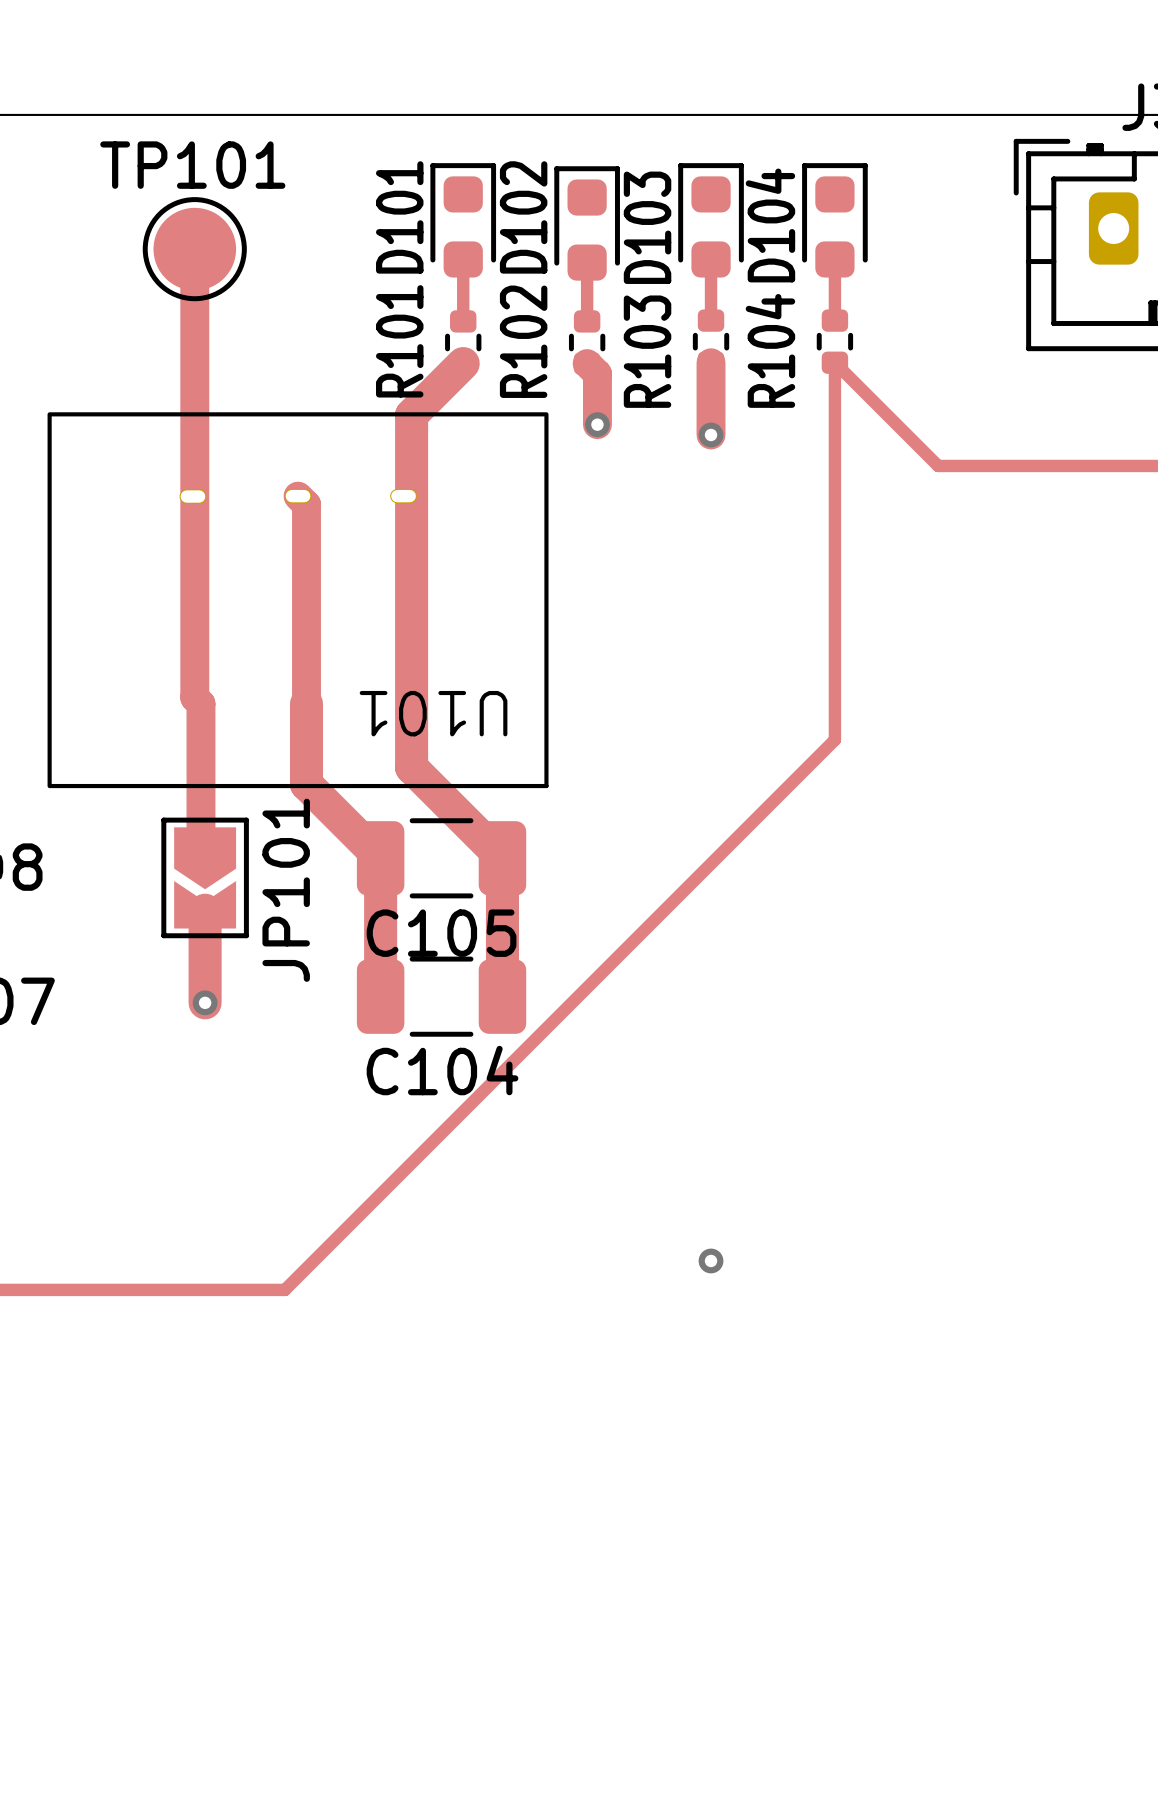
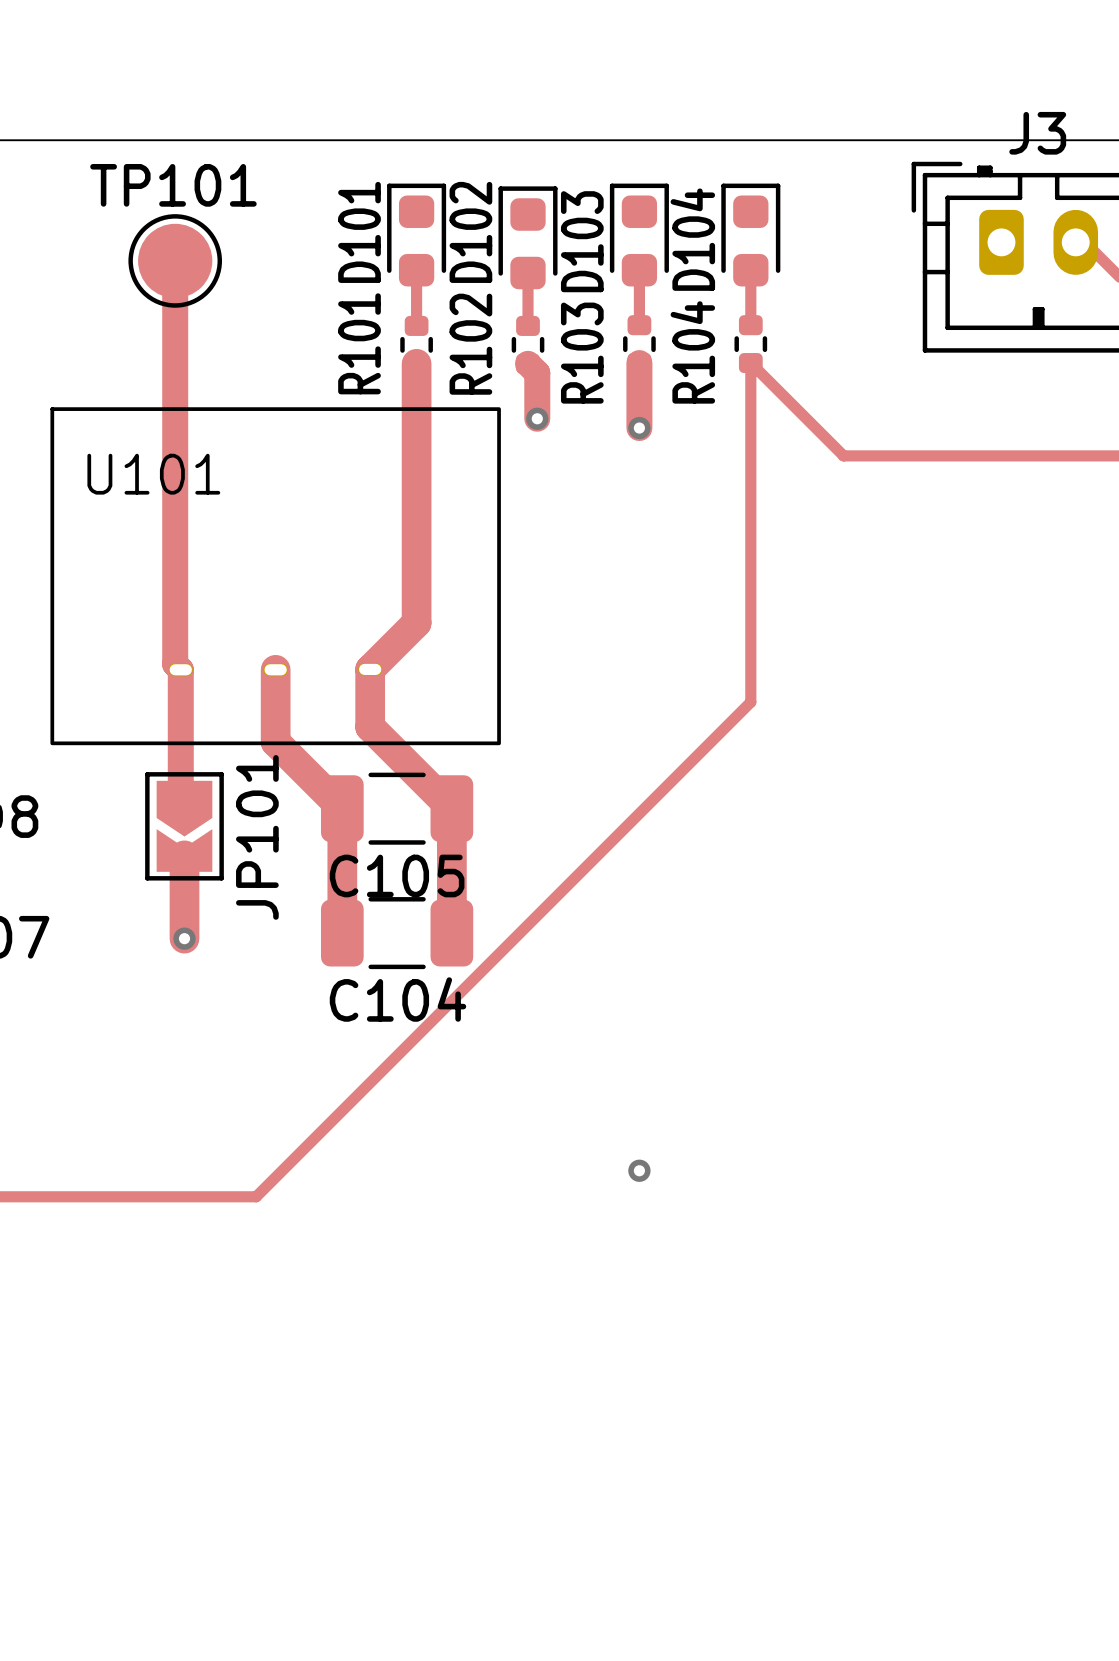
track: (463, 363) (411, 415) (411, 703) -> (416, 363) (416, 623) (370, 669)
track: (298, 496) (306, 504) (306, 703) -> none
U101 rotation: 0° (298, 600) -> 180° (275, 576)

